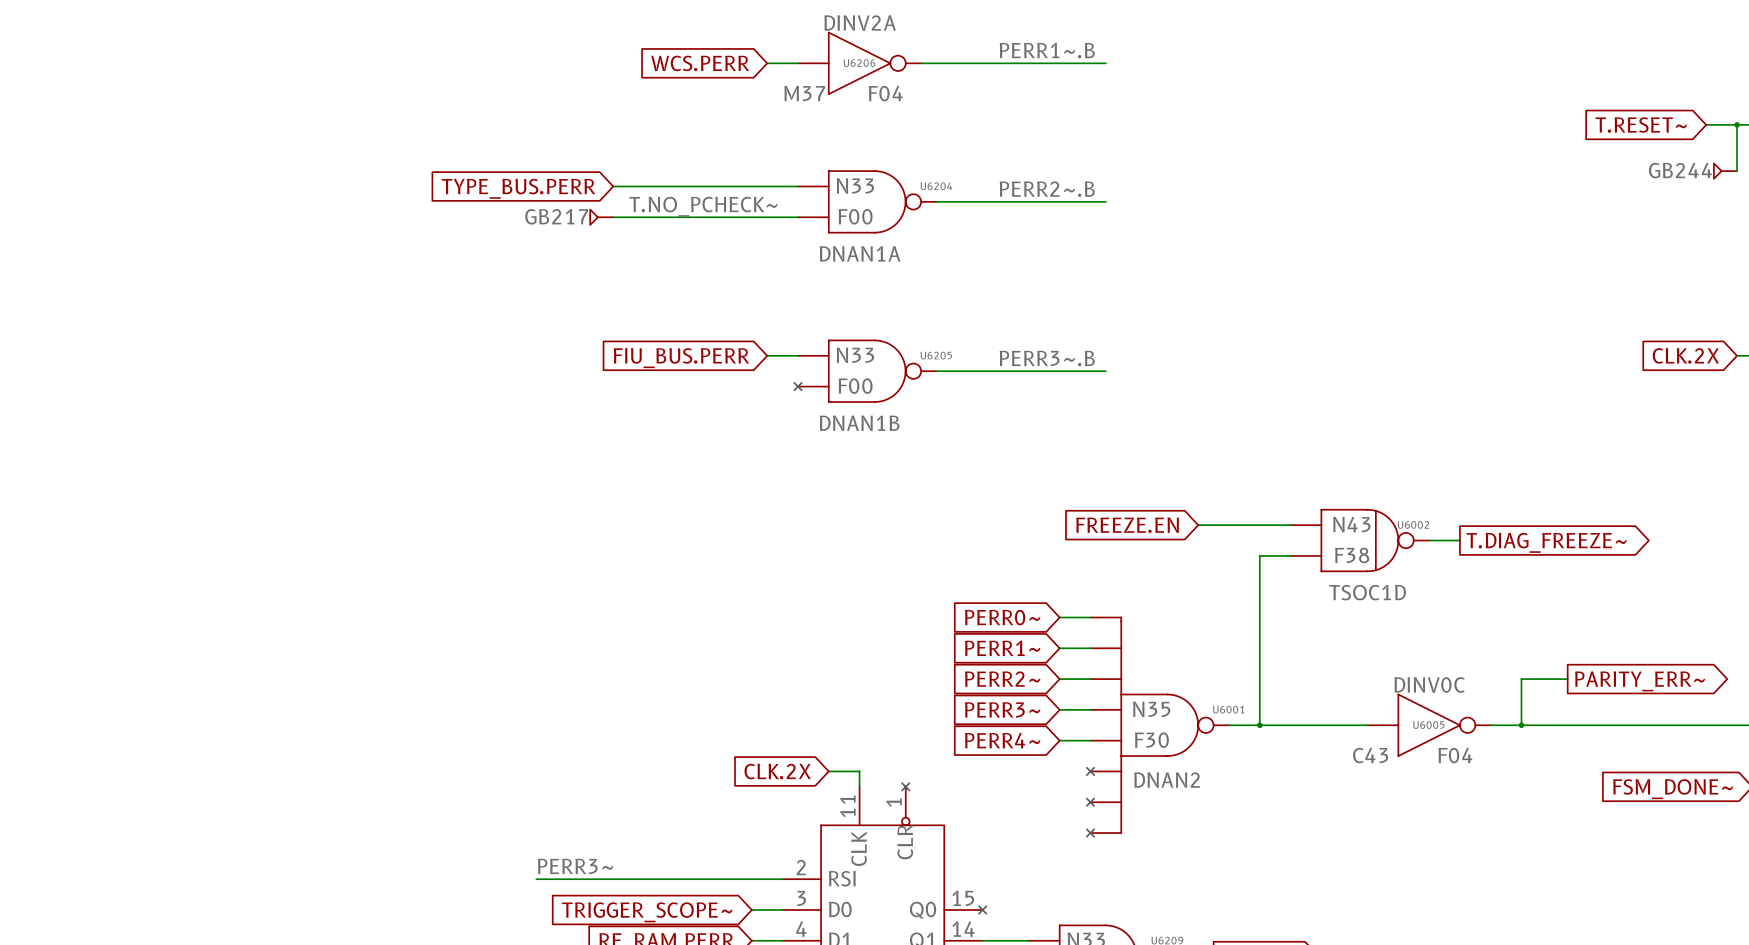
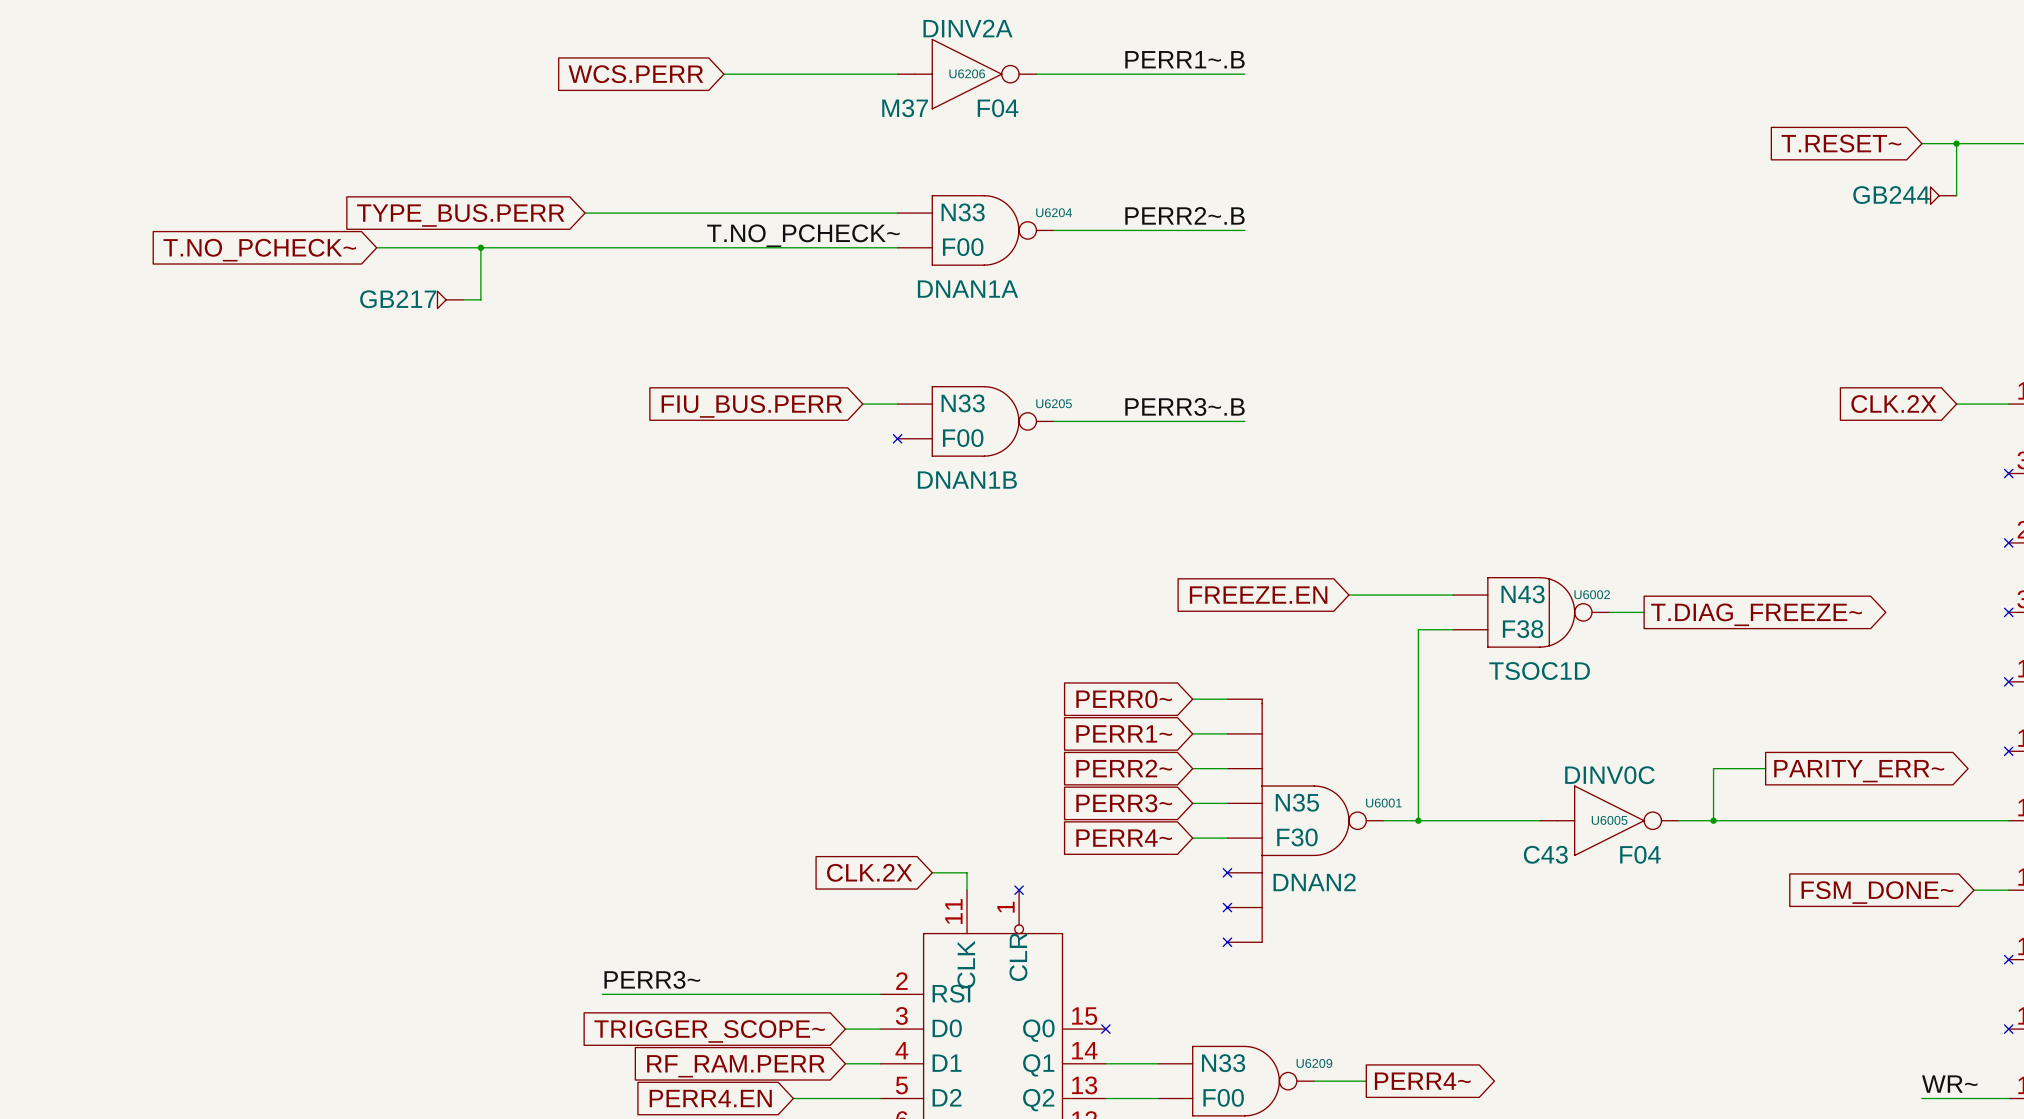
wire: none -> (723, 74) (862, 74)
global label position: WCS.PERR (700, 63) -> WCS.PERR (635, 74)
wire: none -> (585, 213) (689, 213)
global label position: TYPE_BUS.PERR (518, 188) -> TYPE_BUS.PERR (460, 215)
wire: none -> (376, 247) (689, 247)
wire: none -> (480, 247) (480, 299) (463, 299)
junction: none -> (480, 247)
GB217 position: (601, 217) -> (450, 299)
global label: none -> T.NO_PCHECK~ (259, 250)

